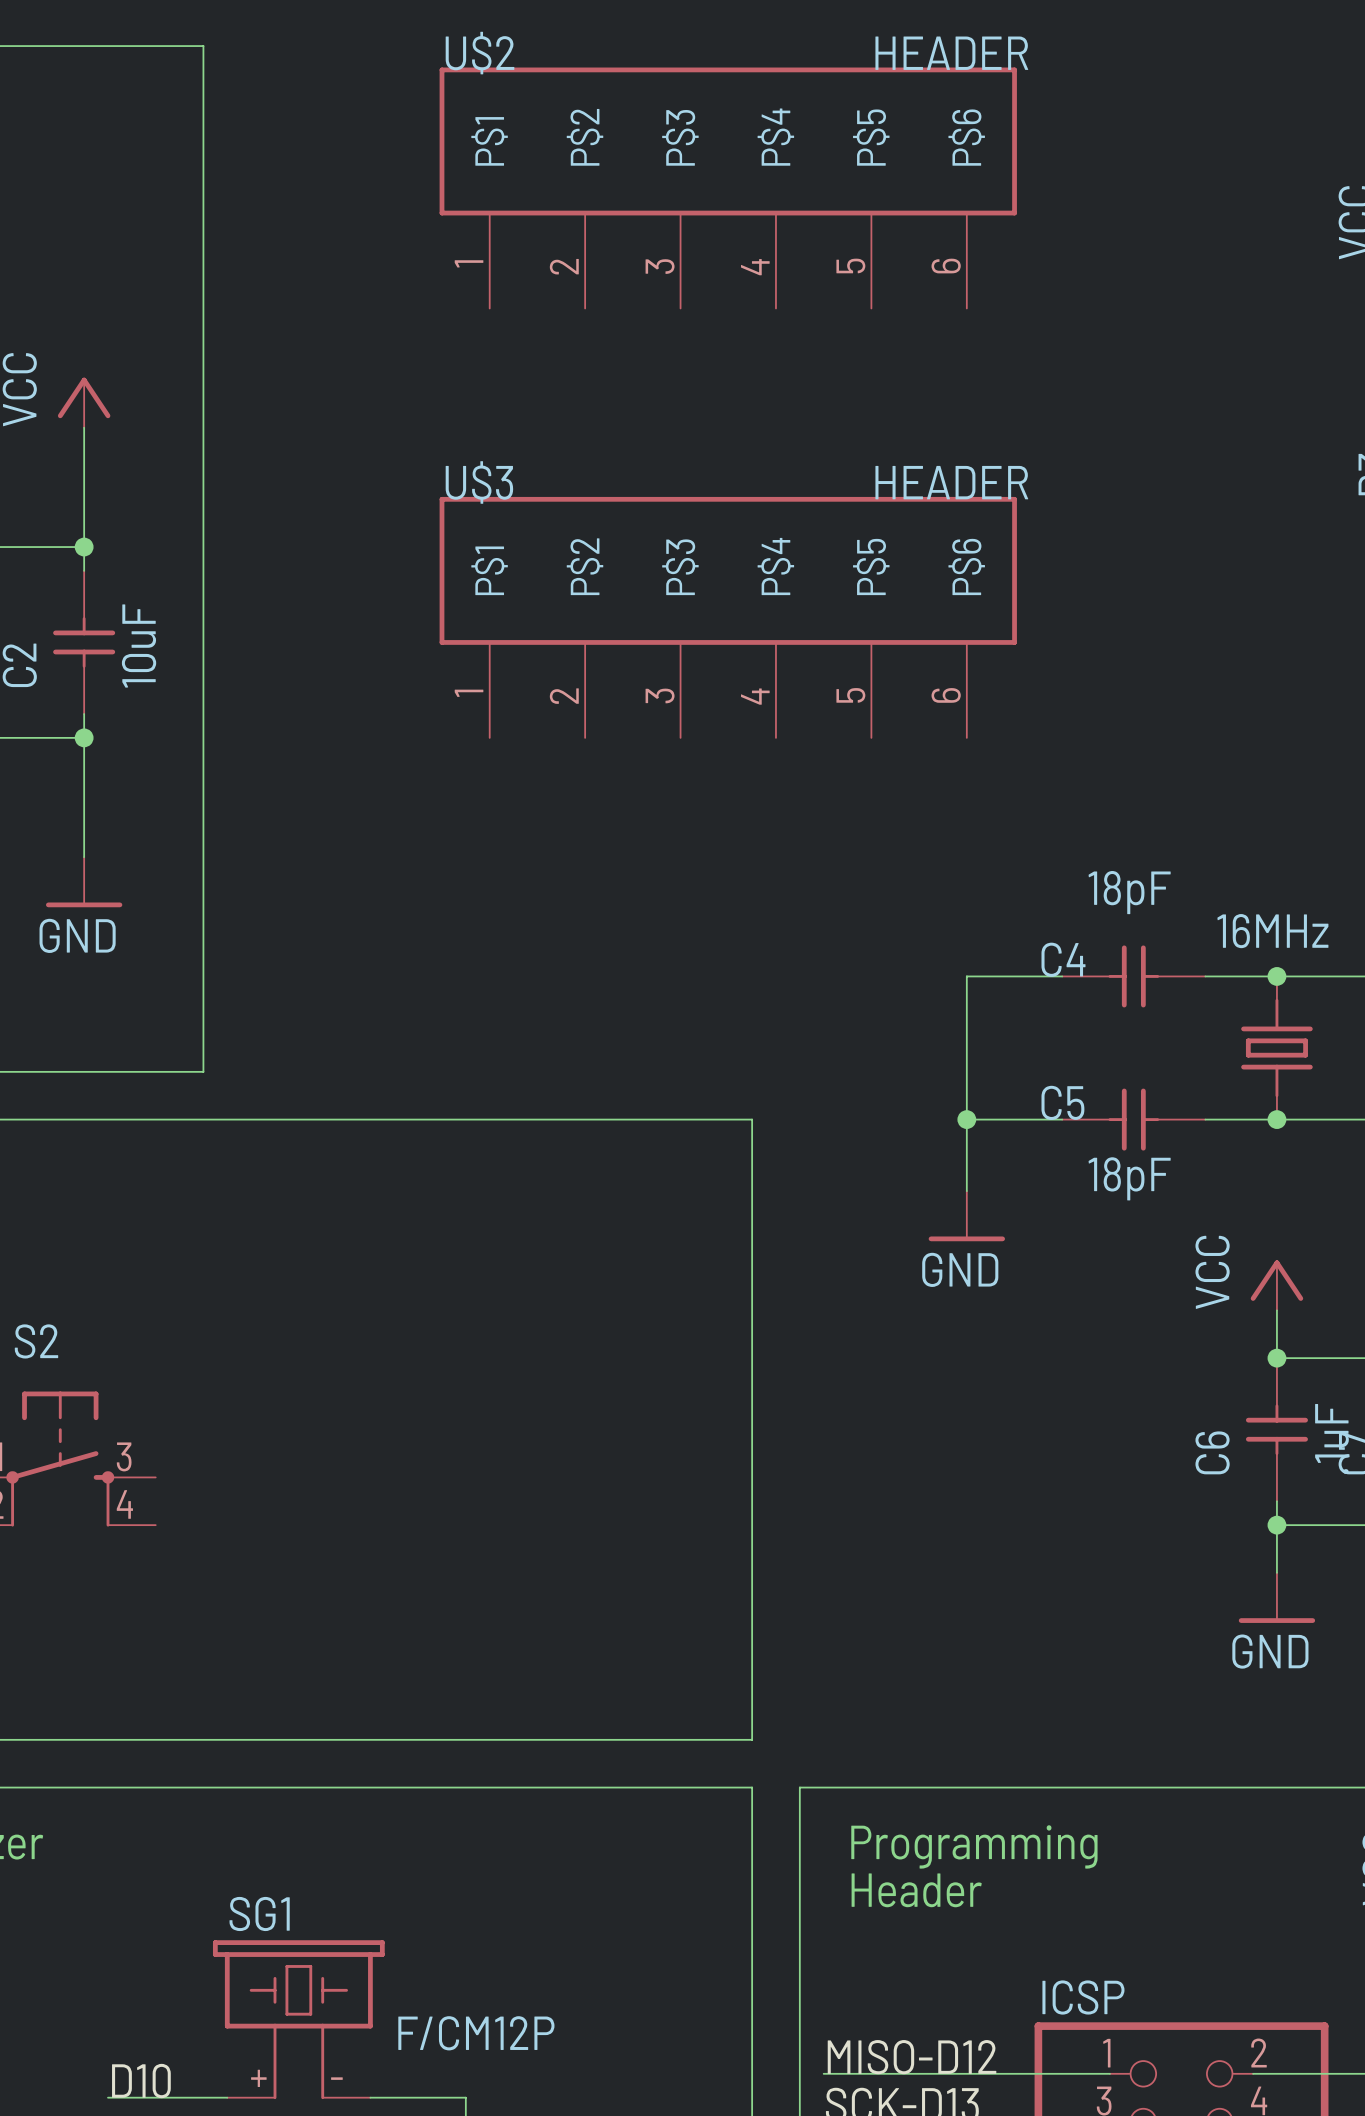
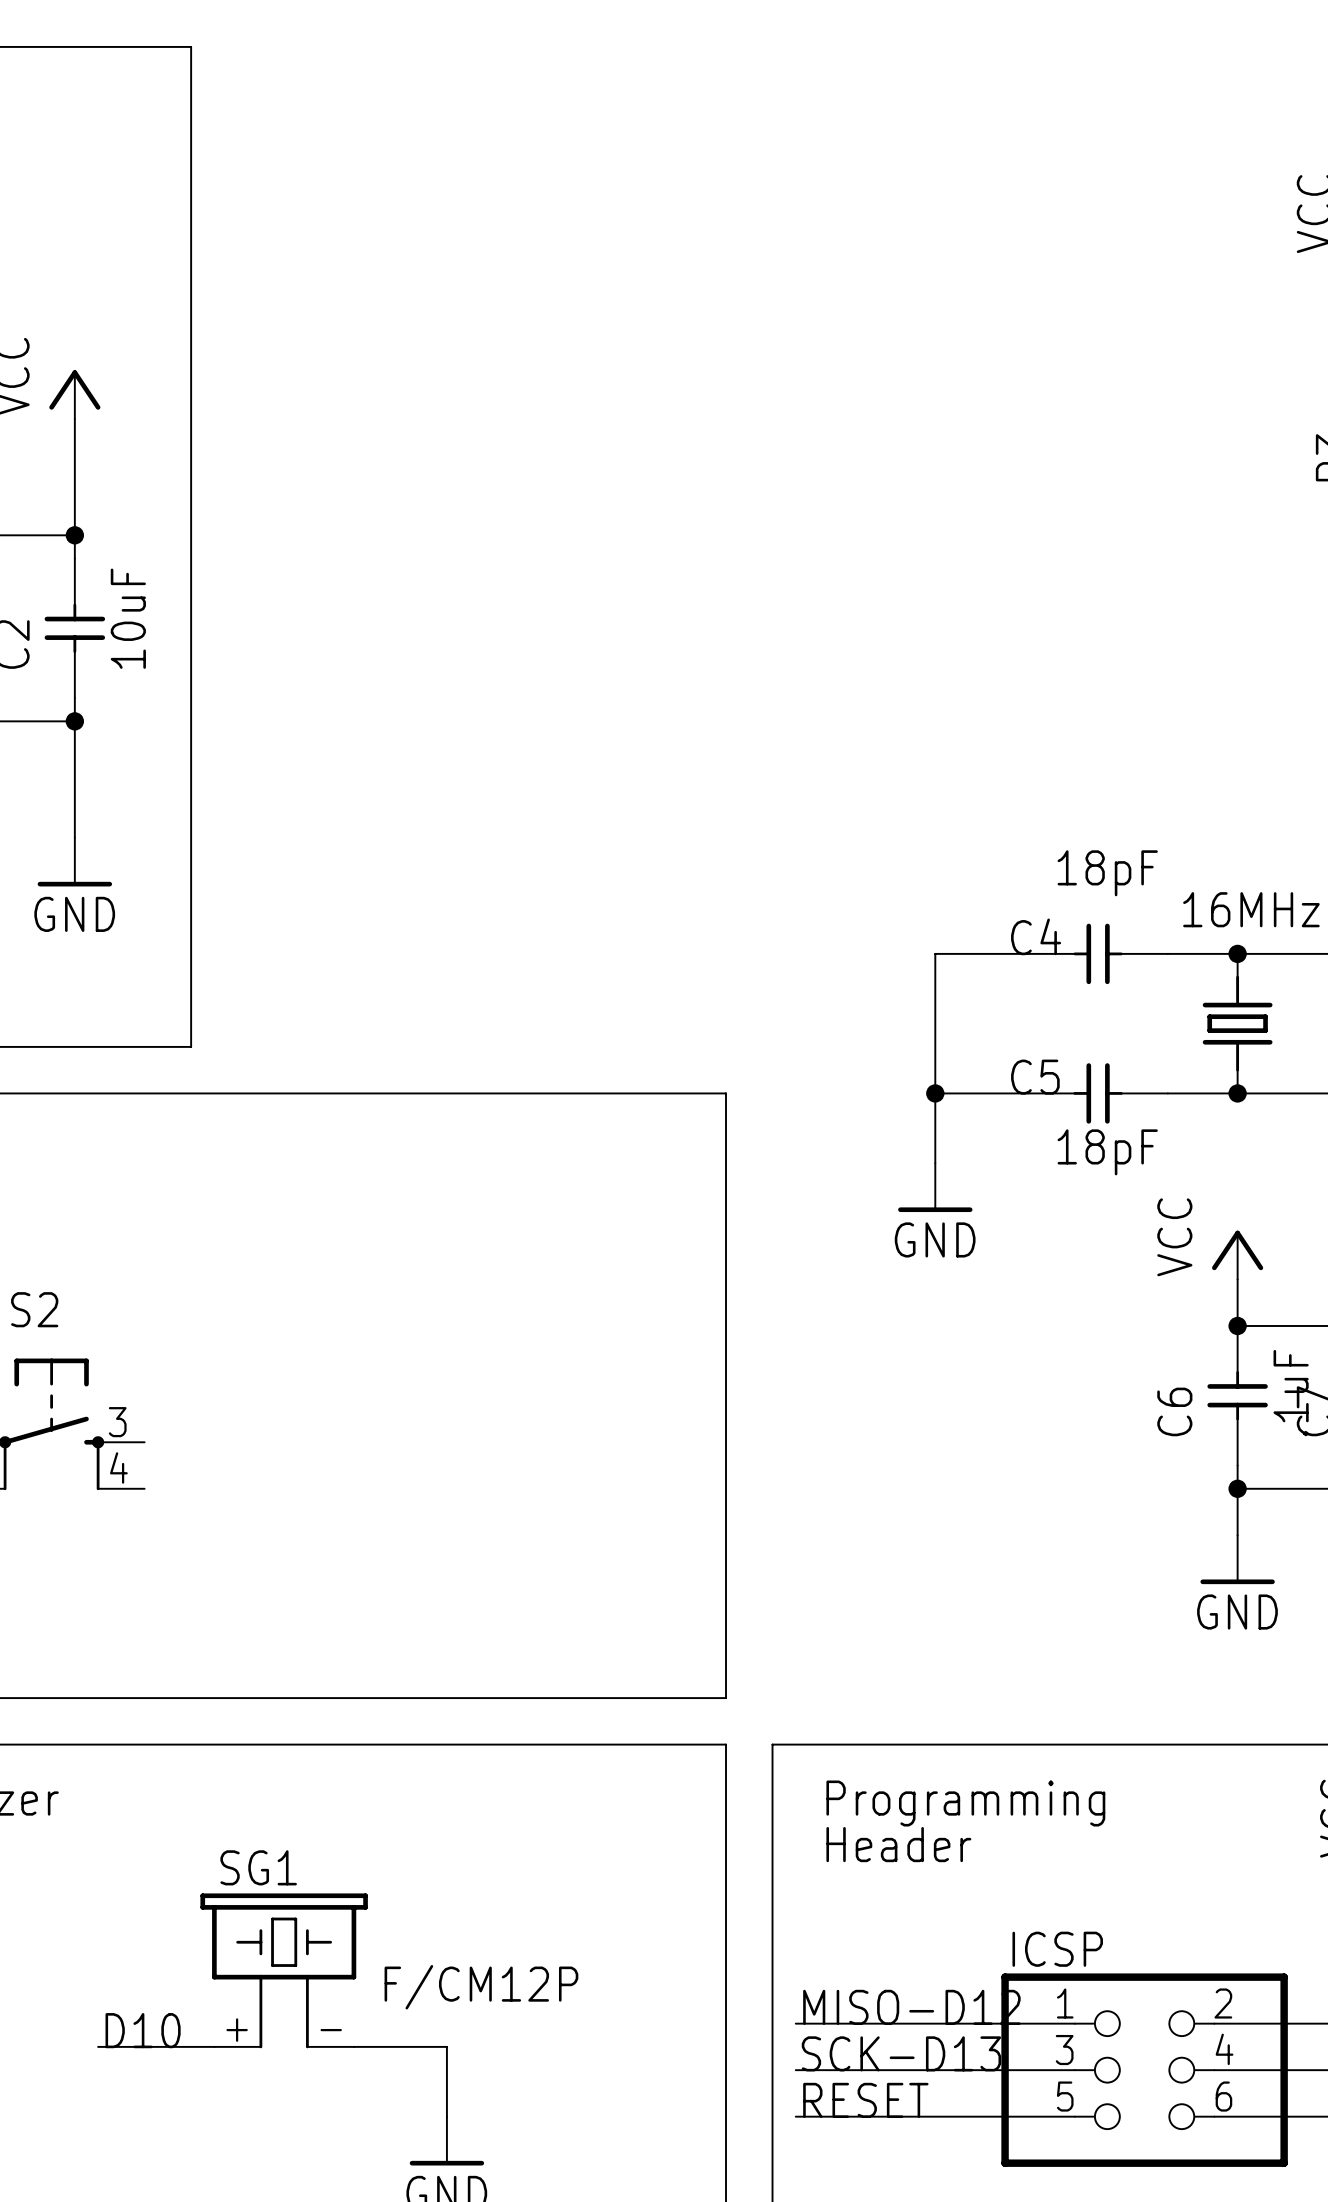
U$2: HEADER (728, 188) -> none
U$3: HEADER (728, 617) -> none

